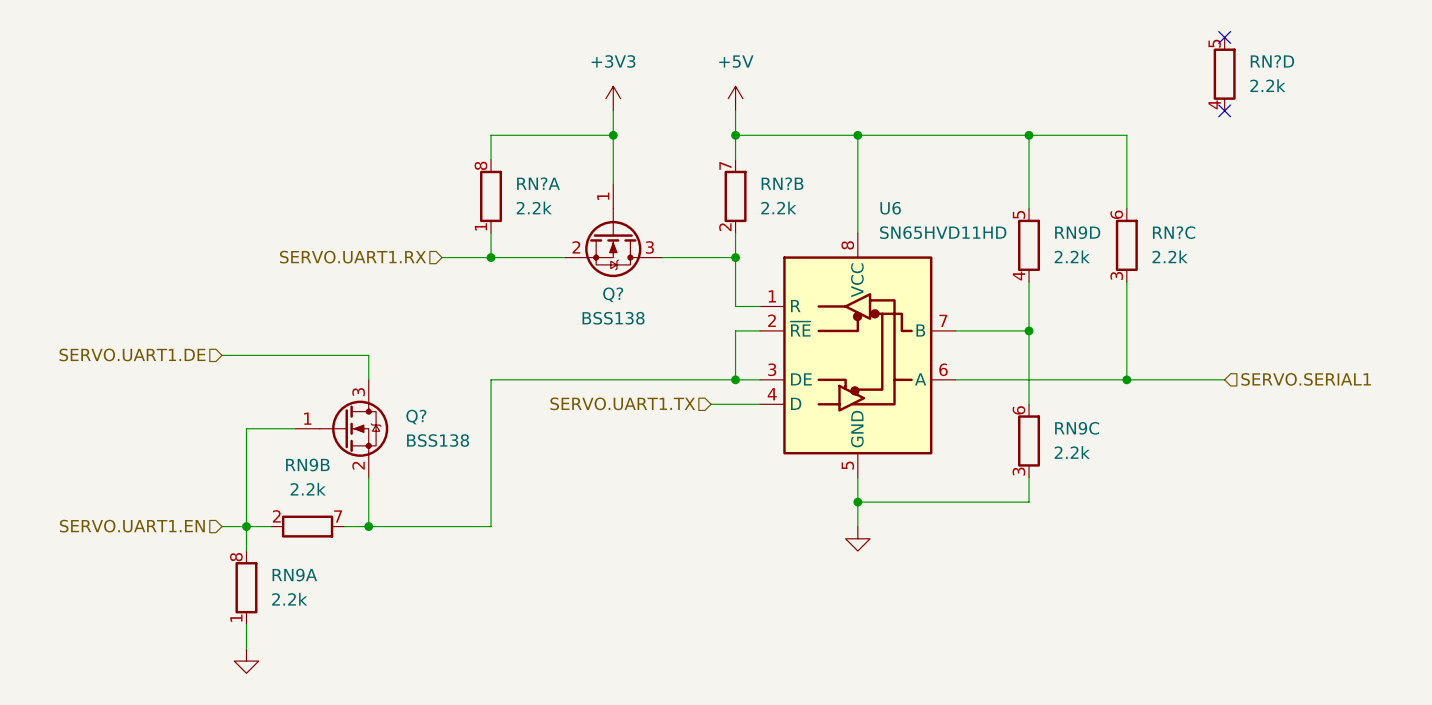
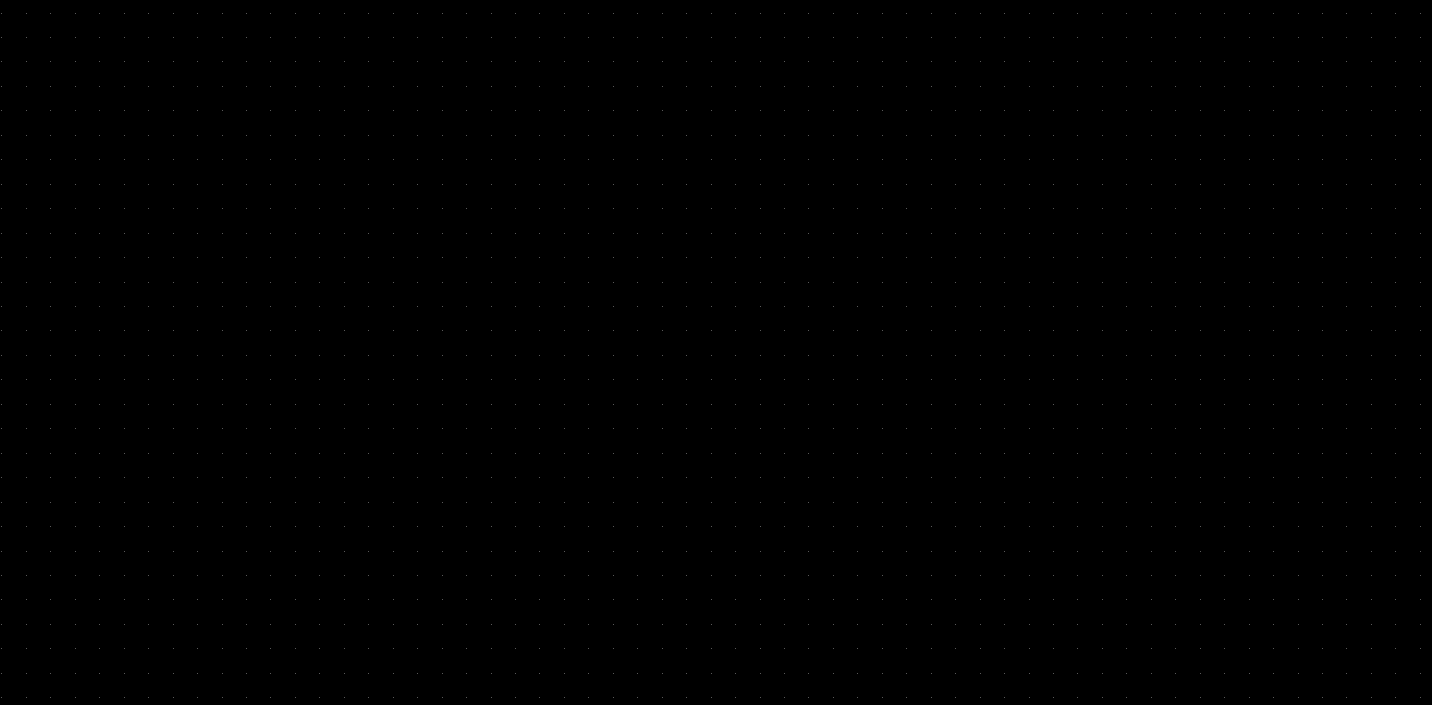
no-connect mark: (1224, 37) -> none
RN?D: 2.2k (1224, 74) -> none
power symbol: +3V3 (613, 98) -> none
power symbol: +5V (735, 98) -> none
wire: (613, 110) (613, 184) -> none
wire: (735, 110) (735, 159) -> none
no-connect mark: (1224, 110) -> none
wire: (613, 135) (491, 135) (491, 159) -> none
junction: (613, 135) -> none
wire: (735, 135) (1126, 135) (1126, 208) -> none
junction: (735, 135) -> none
wire: (857, 135) (857, 233) -> none
junction: (857, 135) -> none
wire: (1029, 135) (1029, 208) -> none
junction: (1029, 135) -> none
RN?A: 2.2k (491, 196) -> none
RN?B: 2.2k (735, 196) -> none
Q?: BSS138 (613, 230) -> none
wire: (491, 233) (491, 257) -> none
wire: (735, 233) (735, 306) (760, 306) -> none
RN9D: 2.2k (1029, 245) -> none
RN?C: 2.2k (1126, 245) -> none
hierarchical label: SERVO.UART1.RX (353, 257) -> none
wire: (442, 257) (564, 257) -> none
junction: (491, 257) -> none
wire: (662, 257) (735, 257) -> none
junction: (735, 257) -> none
wire: (1029, 282) (1029, 404) -> none
wire: (1126, 282) (1126, 379) -> none
wire: (760, 330) (735, 330) (735, 379) -> none
wire: (955, 330) (1029, 330) -> none
junction: (1029, 330) -> none
hierarchical label: SERVO.UART1.DE (132, 354) -> none
wire: (222, 355) (368, 355) (368, 379) -> none
U6: SN65HVD11HD (857, 355) -> none
junction: (735, 379) -> none
wire: (760, 379) (491, 379) (491, 526) (344, 526) -> none
wire: (955, 379) (1224, 379) -> none
junction: (1126, 379) -> none
hierarchical label: SERVO.SERIAL1 (1306, 379) -> none
hierarchical label: SERVO.UART1.TX (622, 403) -> none
wire: (711, 404) (760, 404) -> none
wire: (295, 428) (246, 428) (246, 551) -> none
Q?: BSS138 (341, 428) -> none
RN9C: 2.2k (1029, 440) -> none
wire: (368, 477) (368, 526) -> none
wire: (857, 477) (857, 526) -> none
wire: (1029, 477) (1029, 502) (857, 502) -> none
junction: (857, 502) -> none
hierarchical label: SERVO.UART1.EN (132, 526) -> none
wire: (222, 526) (270, 526) -> none
junction: (246, 526) -> none
RN9B: 2.2k (307, 526) -> none
junction: (368, 526) -> none
power symbol: (857, 538) -> none
RN9A: 2.2k (246, 587) -> none
wire: (246, 624) (246, 648) -> none
power symbol: (246, 661) -> none

